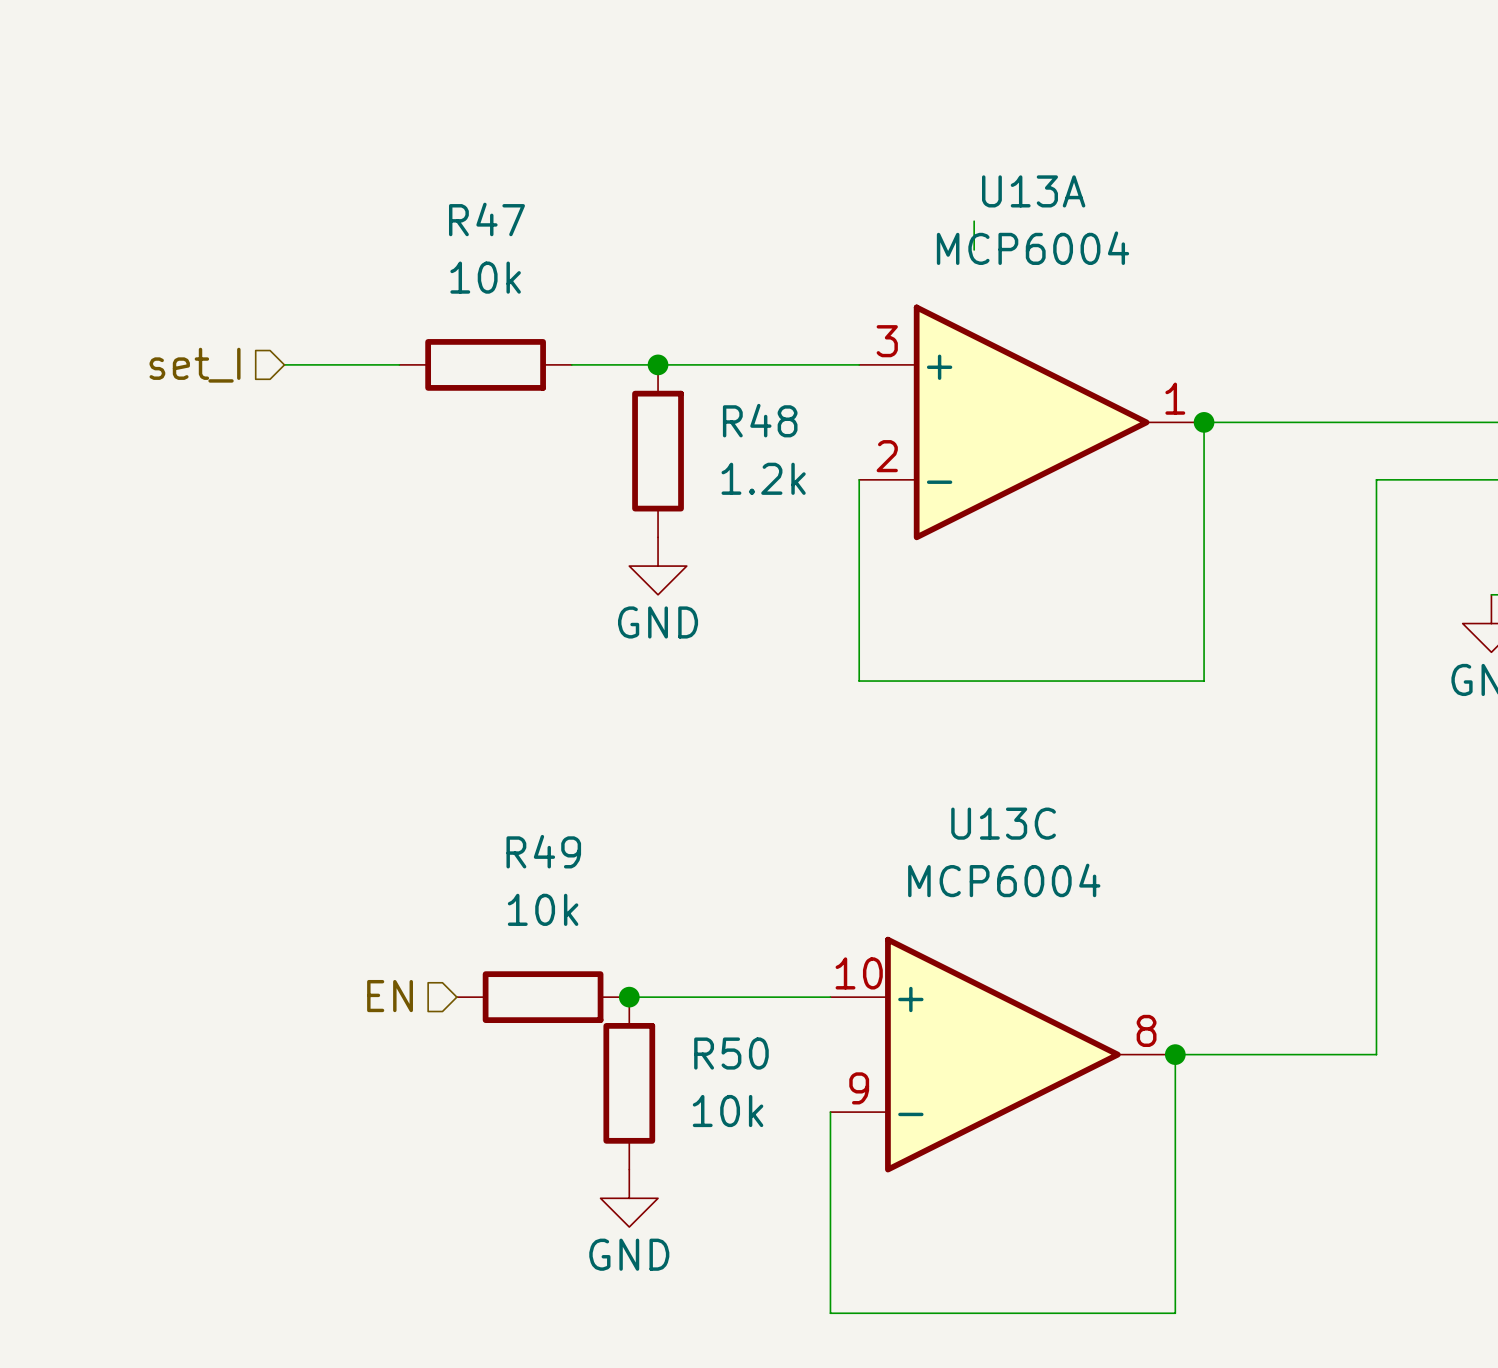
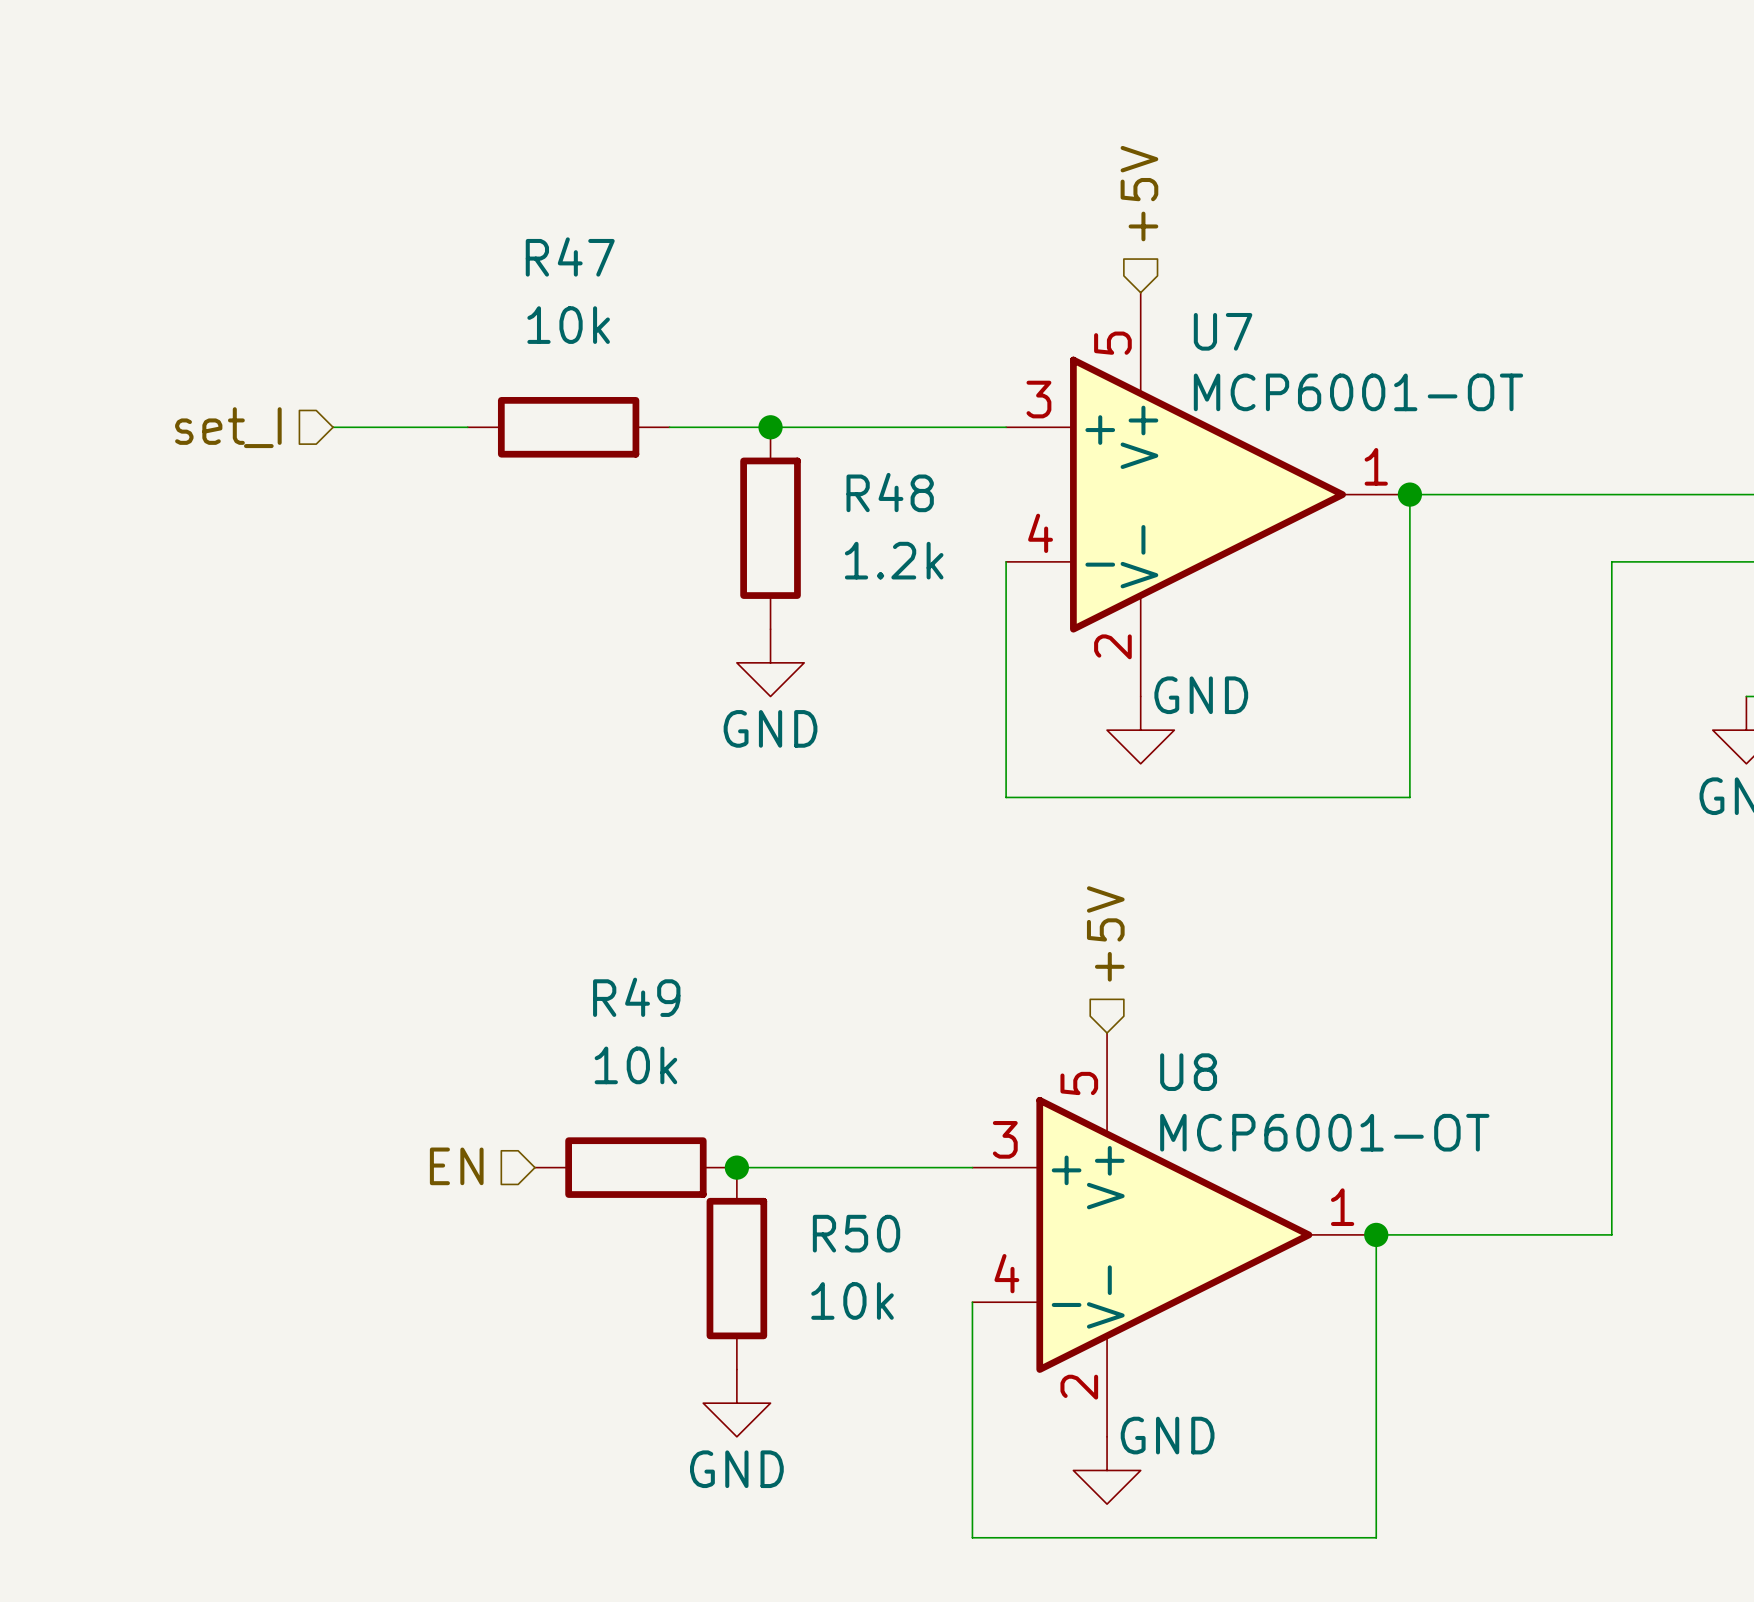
hierarchical label: none -> +5V (1139, 193)
wire: (974, 221) (974, 249) -> none
U13A: MCP6004 (1031, 422) -> none
U7: none -> MCP6001-OT (1207, 494)
power symbol: none -> GND (1140, 730)
hierarchical label: none -> +5V (1105, 933)
U13C: MCP6004 (1002, 1054) -> none
U8: none -> MCP6001-OT (1174, 1234)
power symbol: none -> GND (1107, 1470)

